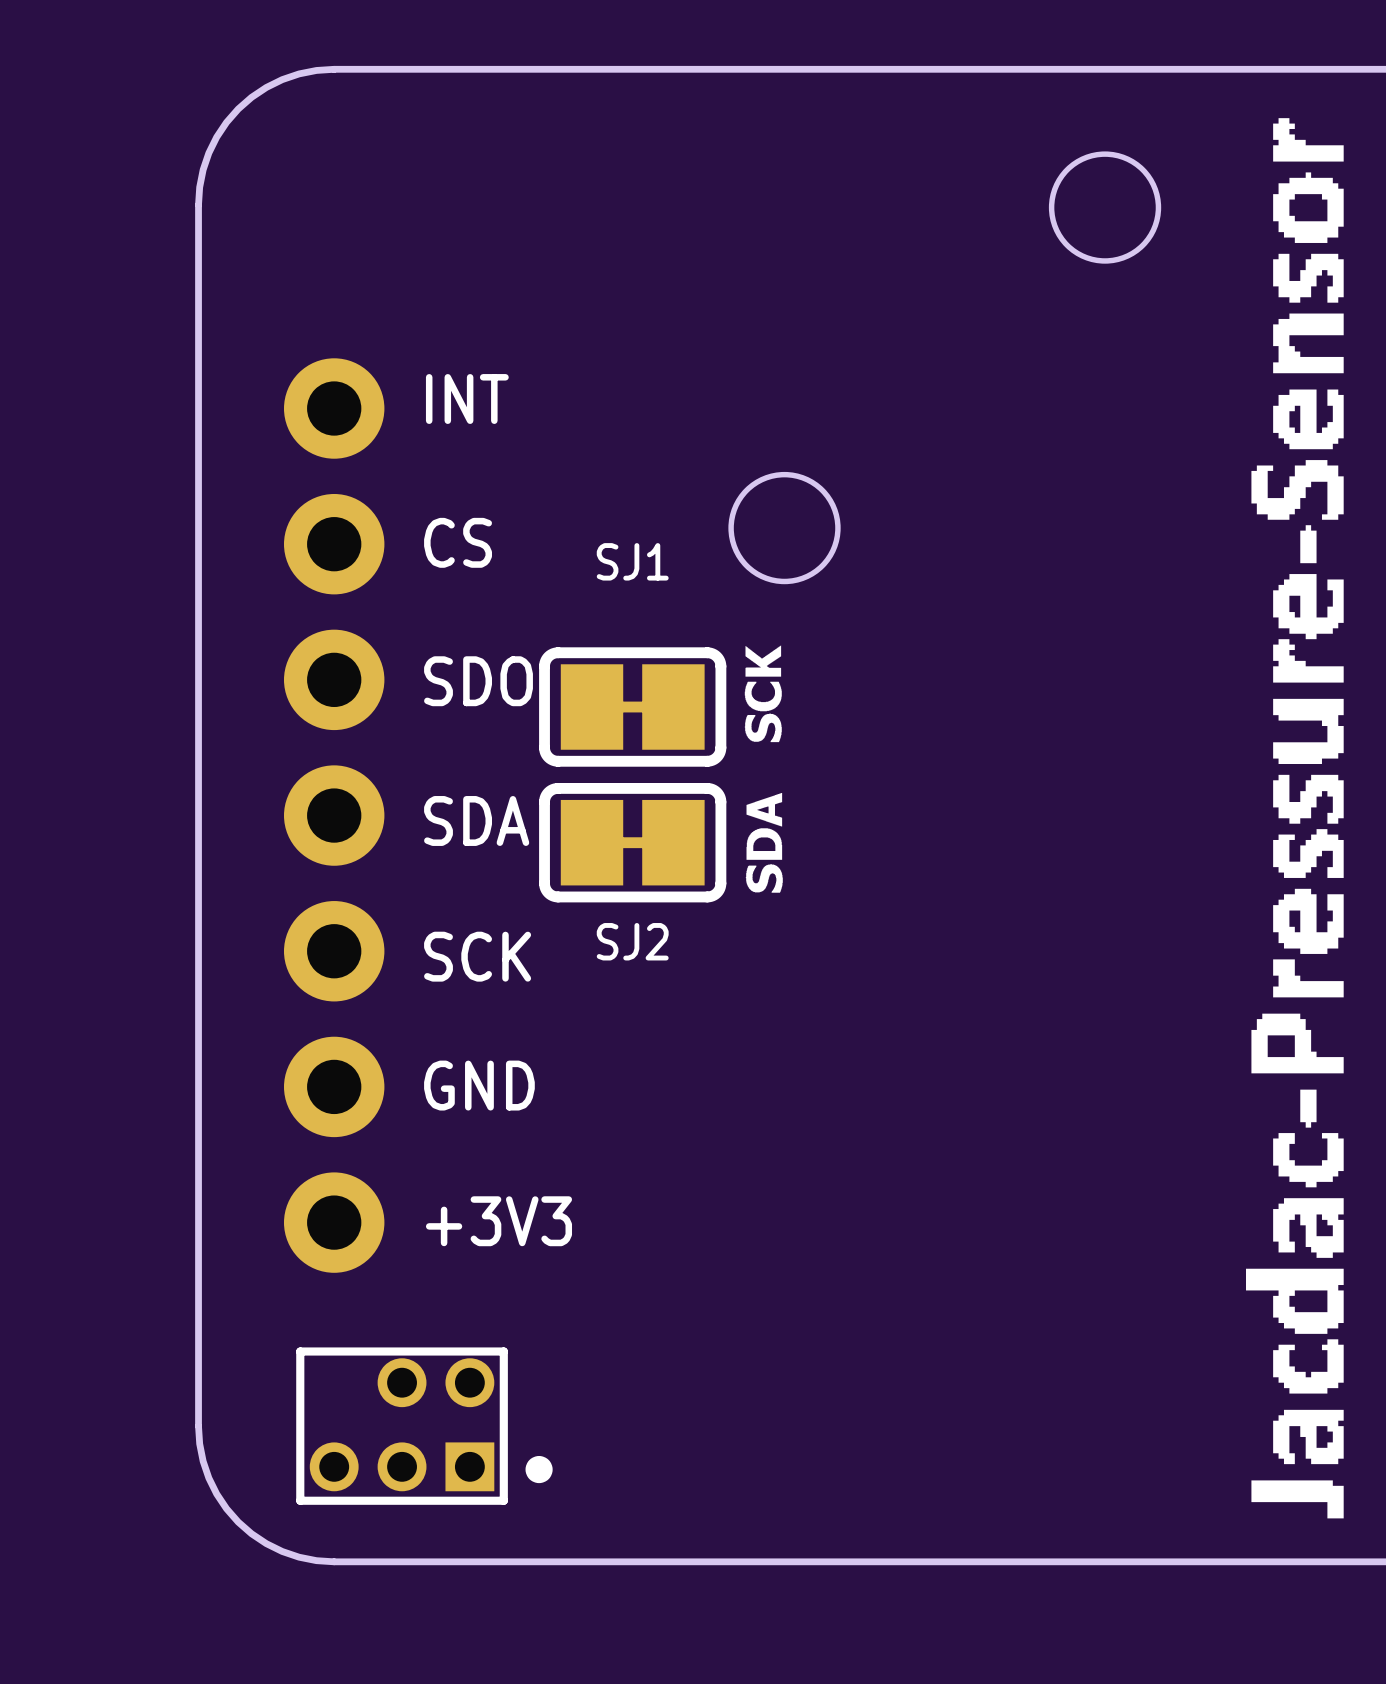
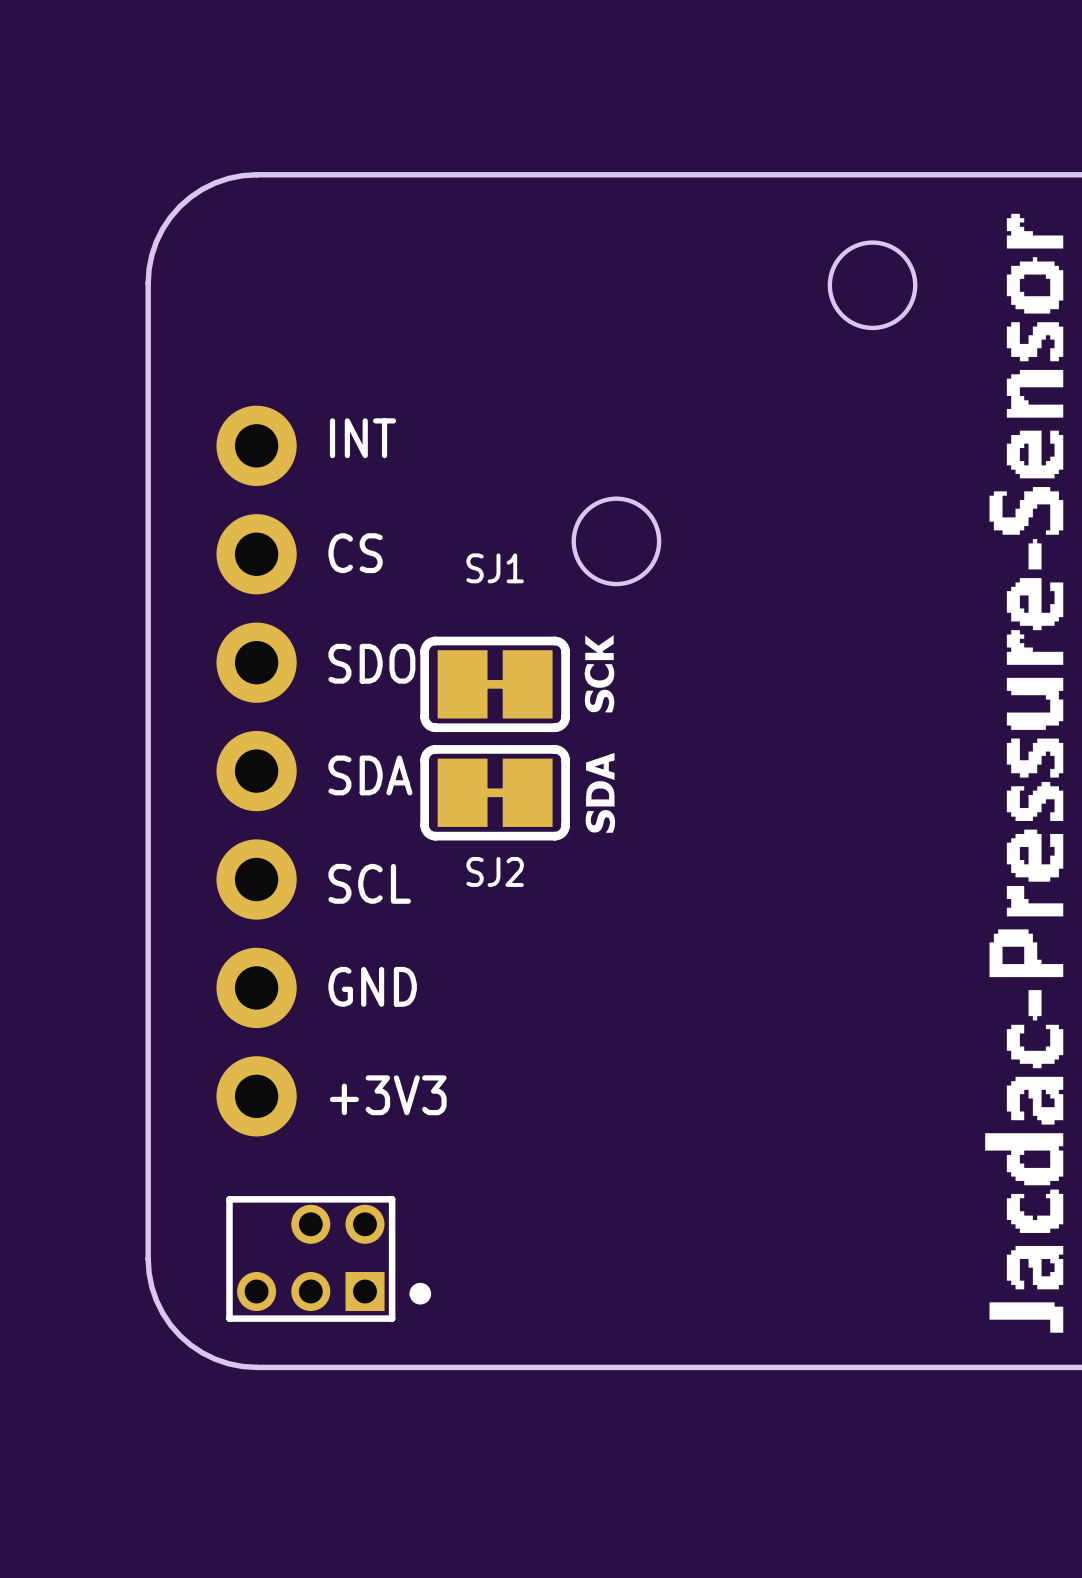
text: SCK (477, 956) -> SCL (369, 883)

